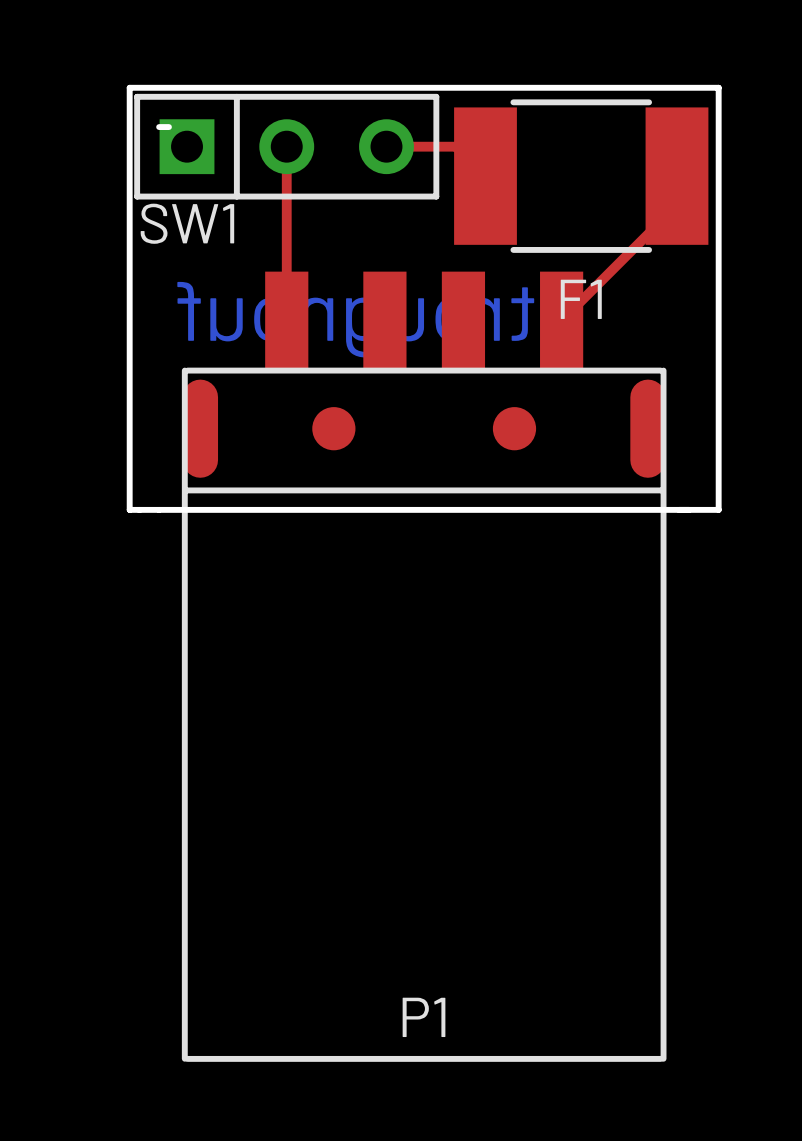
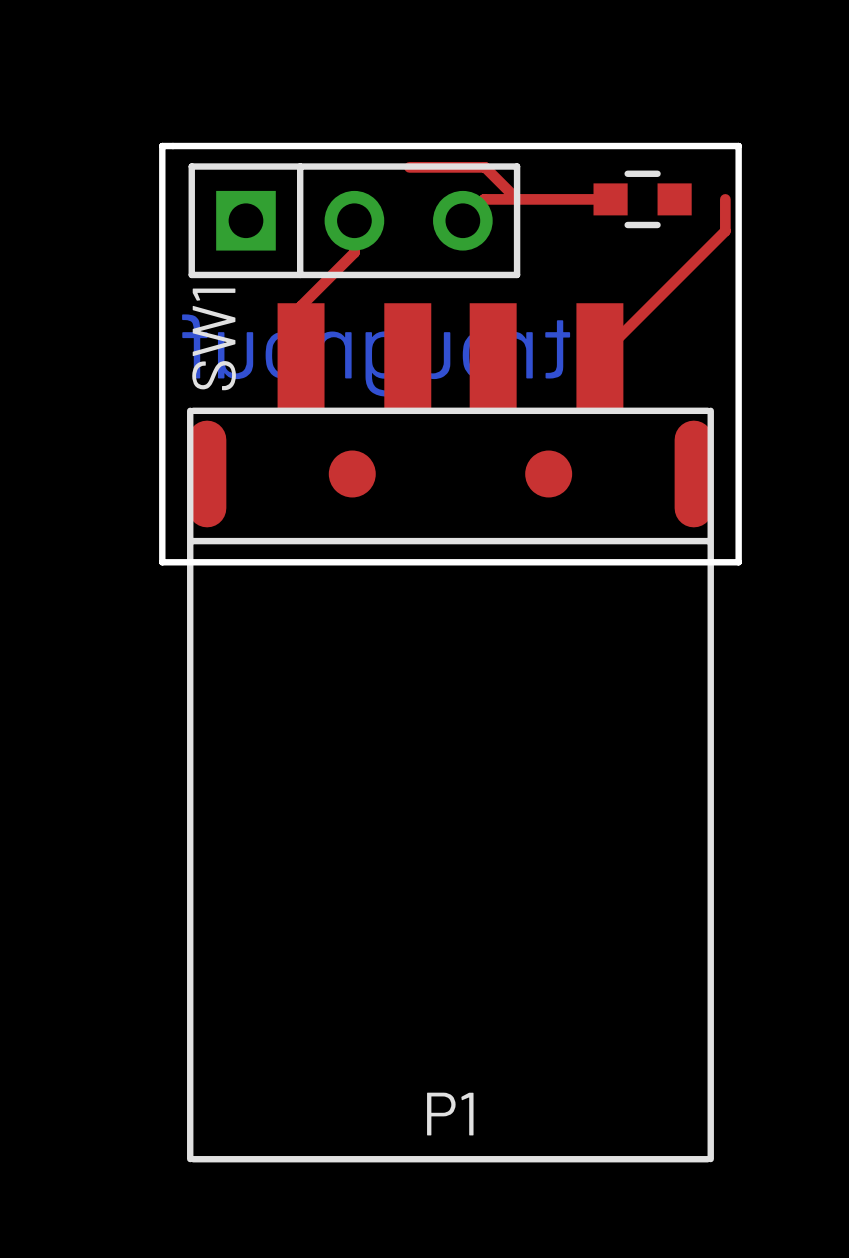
board edge: none -> (162, 146) (162, 562)
top track: (286, 146) (286, 274) -> (354, 220) (354, 252) (301, 306)
SW1 position: (286, 146) -> (354, 220)
top track: none -> (610, 199) (484, 199) (462, 220)
F1: (581, 176) -> none
part: none -> (642, 199)
SW1 name rotation: 0° (187, 223) -> 90° counterclockwise (214, 339)
board edge: (159, 509) (129, 509) (129, 87) (718, 87) (718, 509) (689, 509) -> (172, 146) (738, 146) (738, 562)

